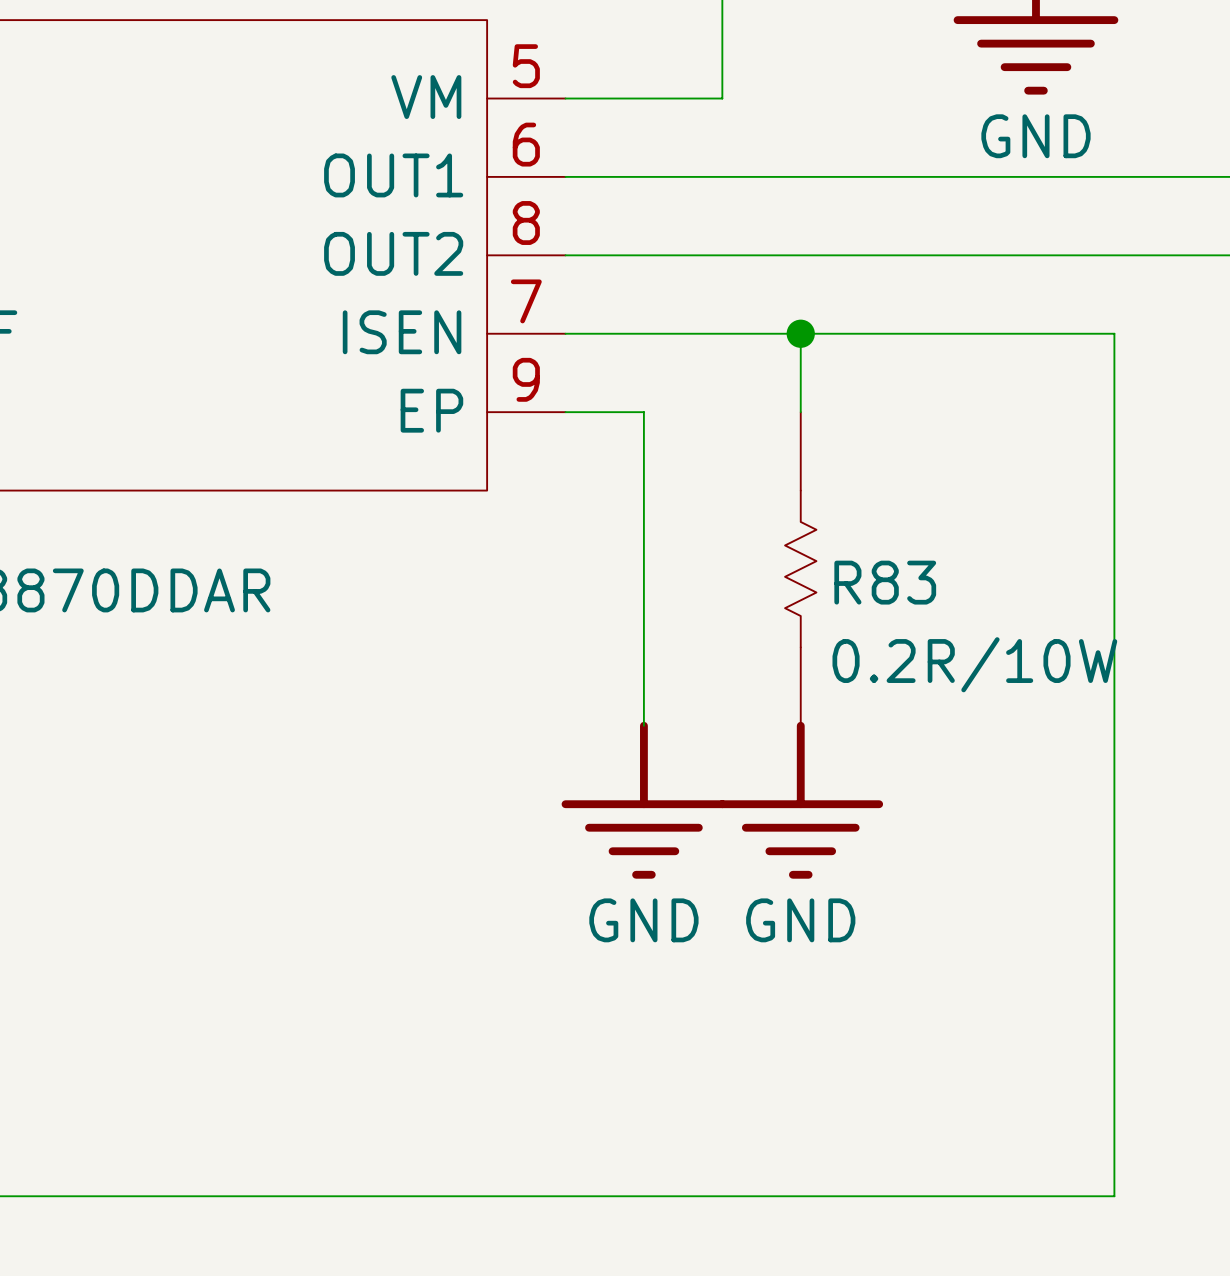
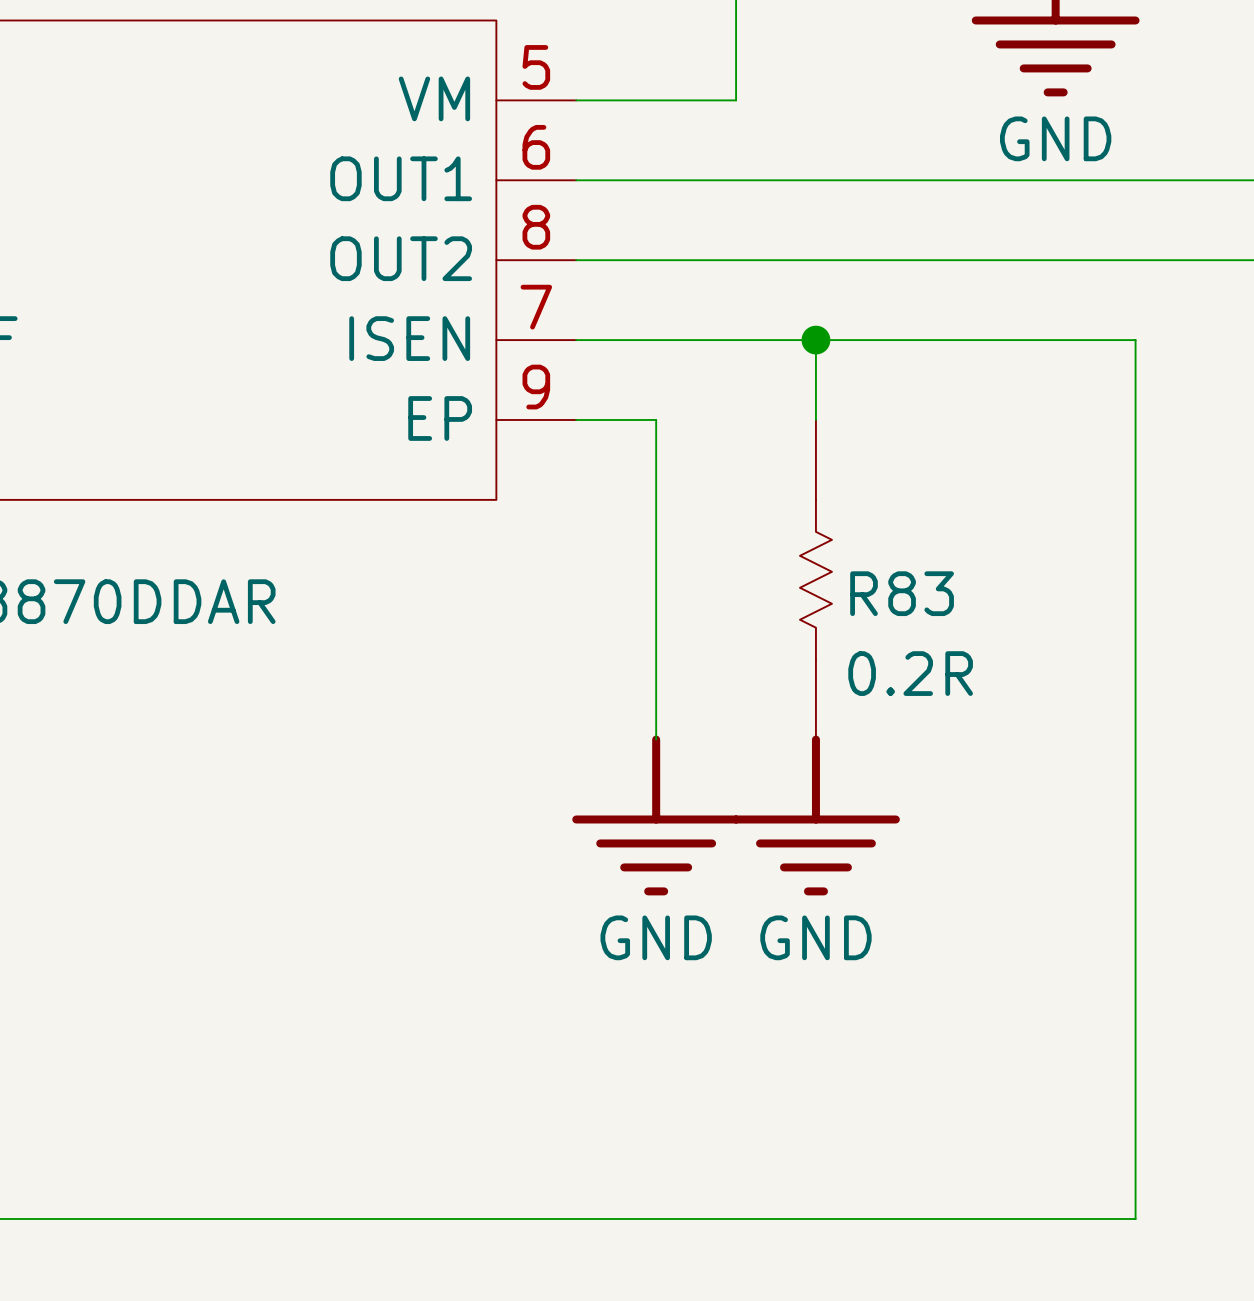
R83 value: 0.2R/10W (974, 664) -> 0.2R (910, 673)

